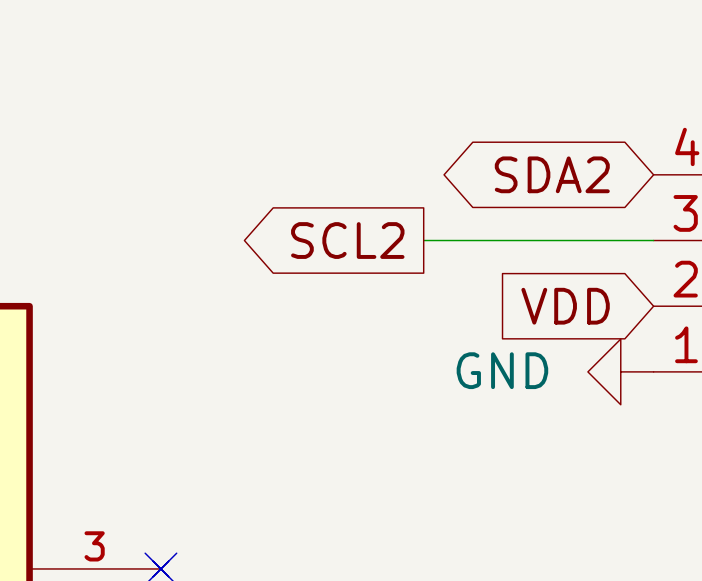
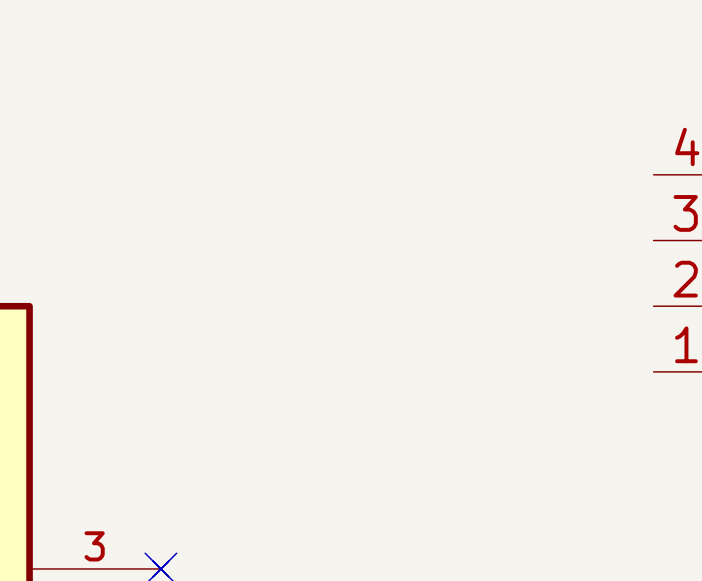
global label: SDA2 (552, 174) -> none
global label: SCL2 (347, 240) -> none
wire: (423, 240) (653, 240) -> none
global label: VDD (565, 306) -> none
power symbol: GND (620, 371) -> none

